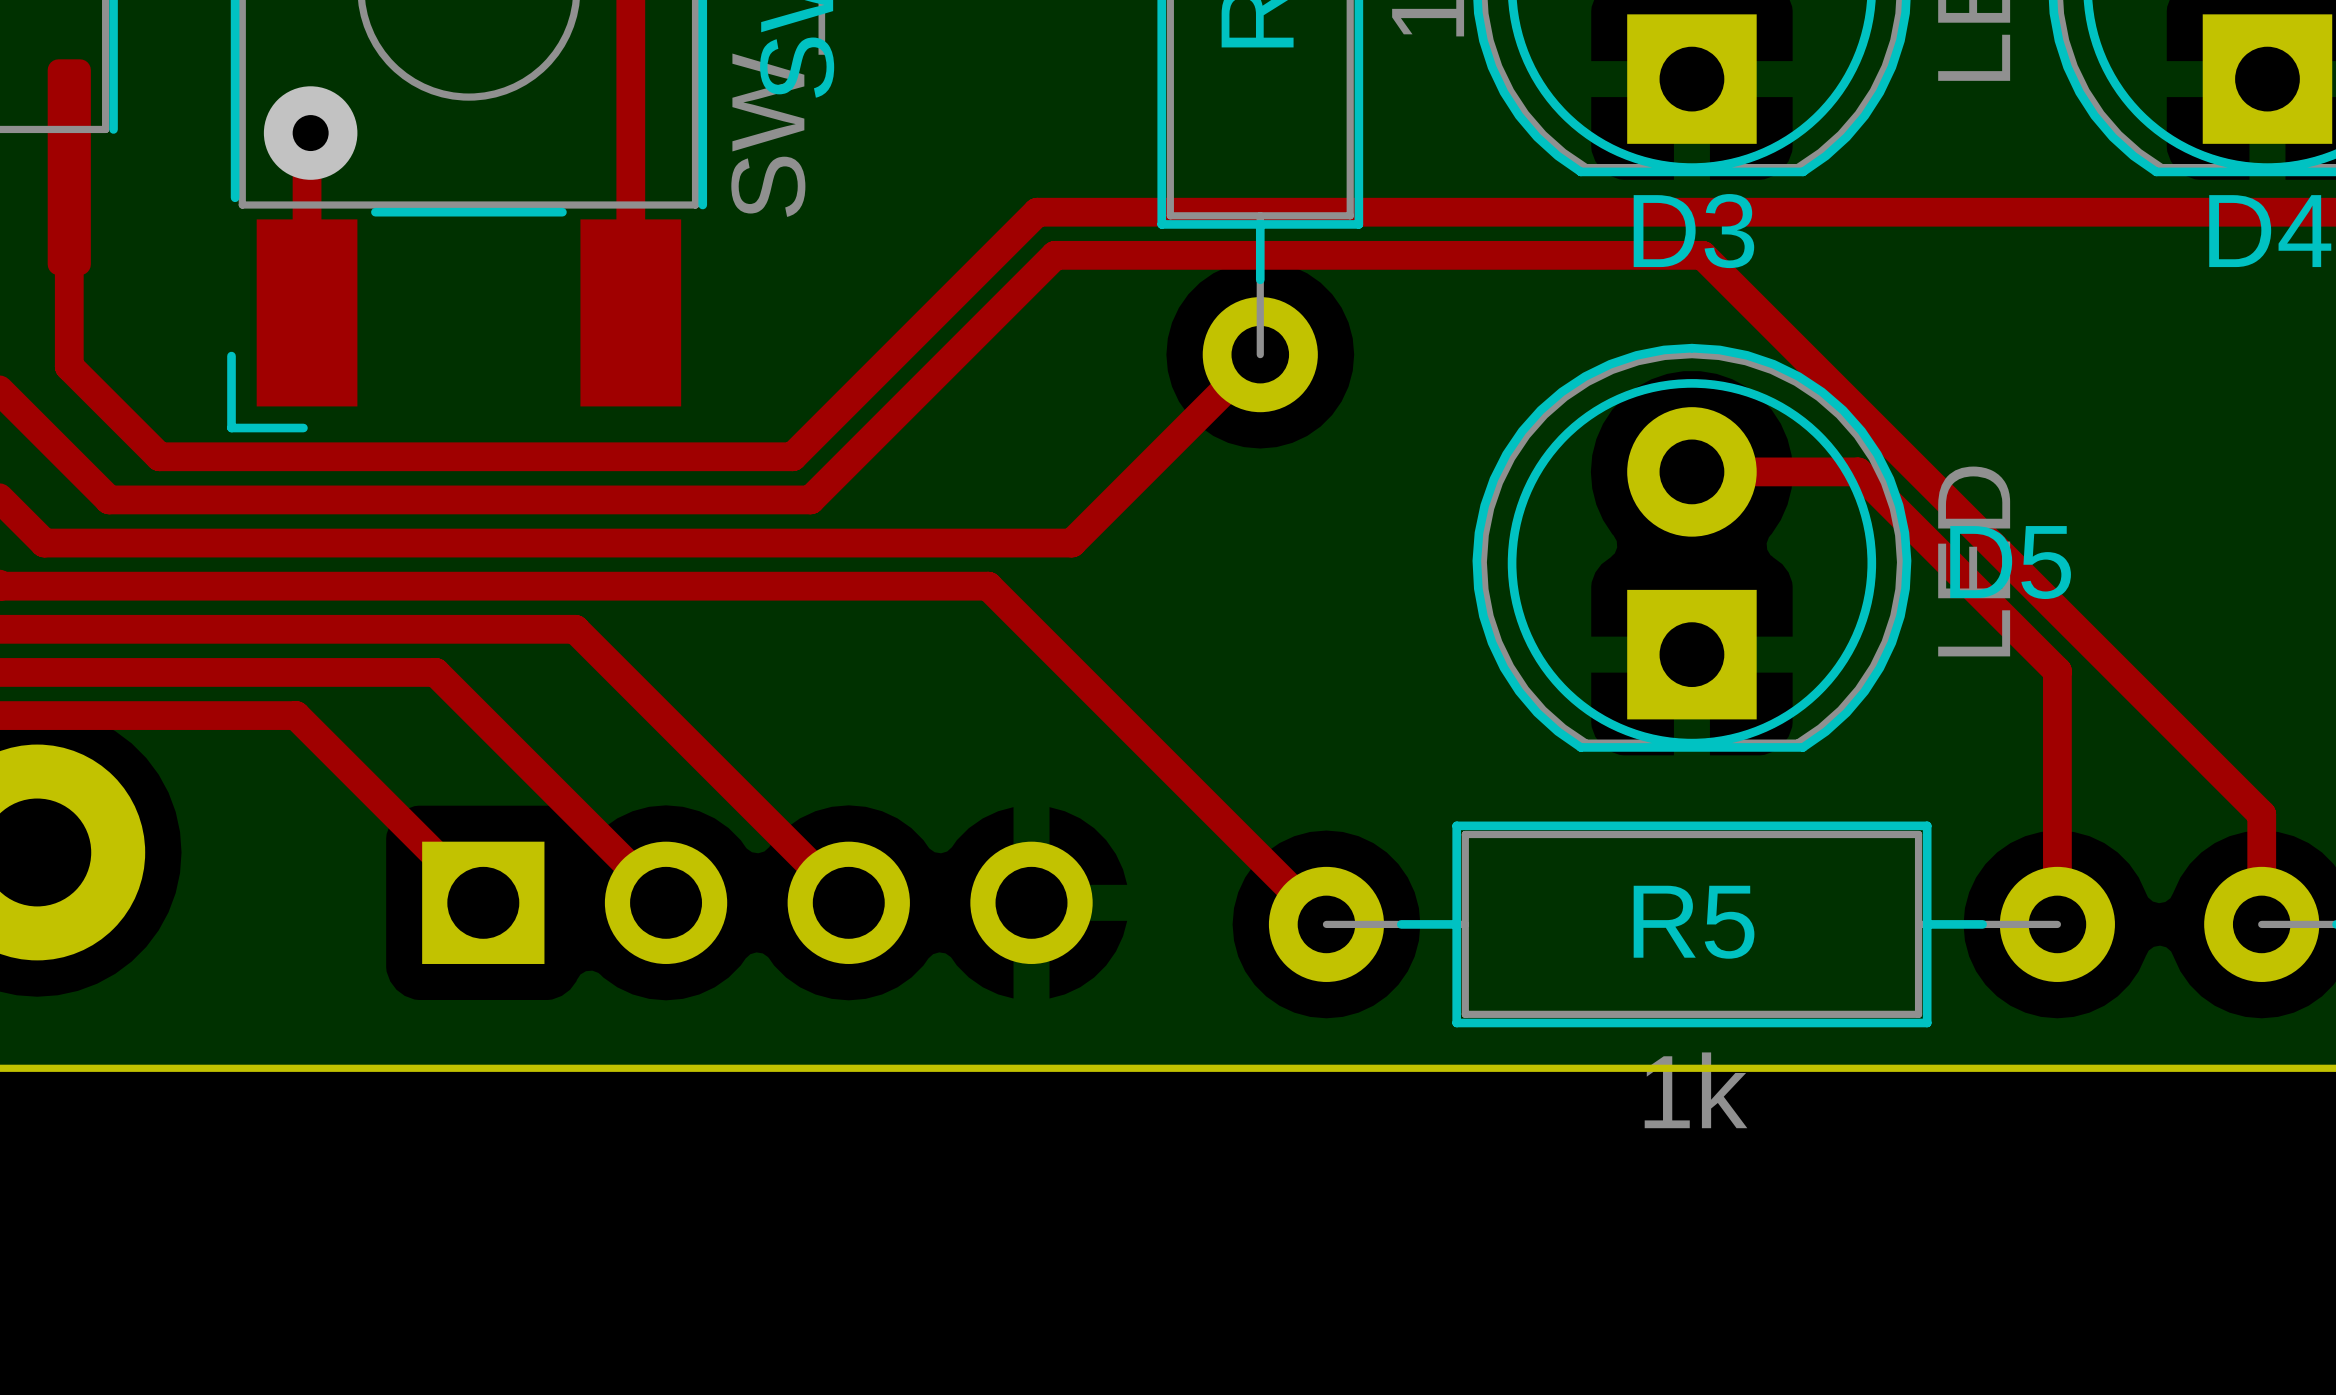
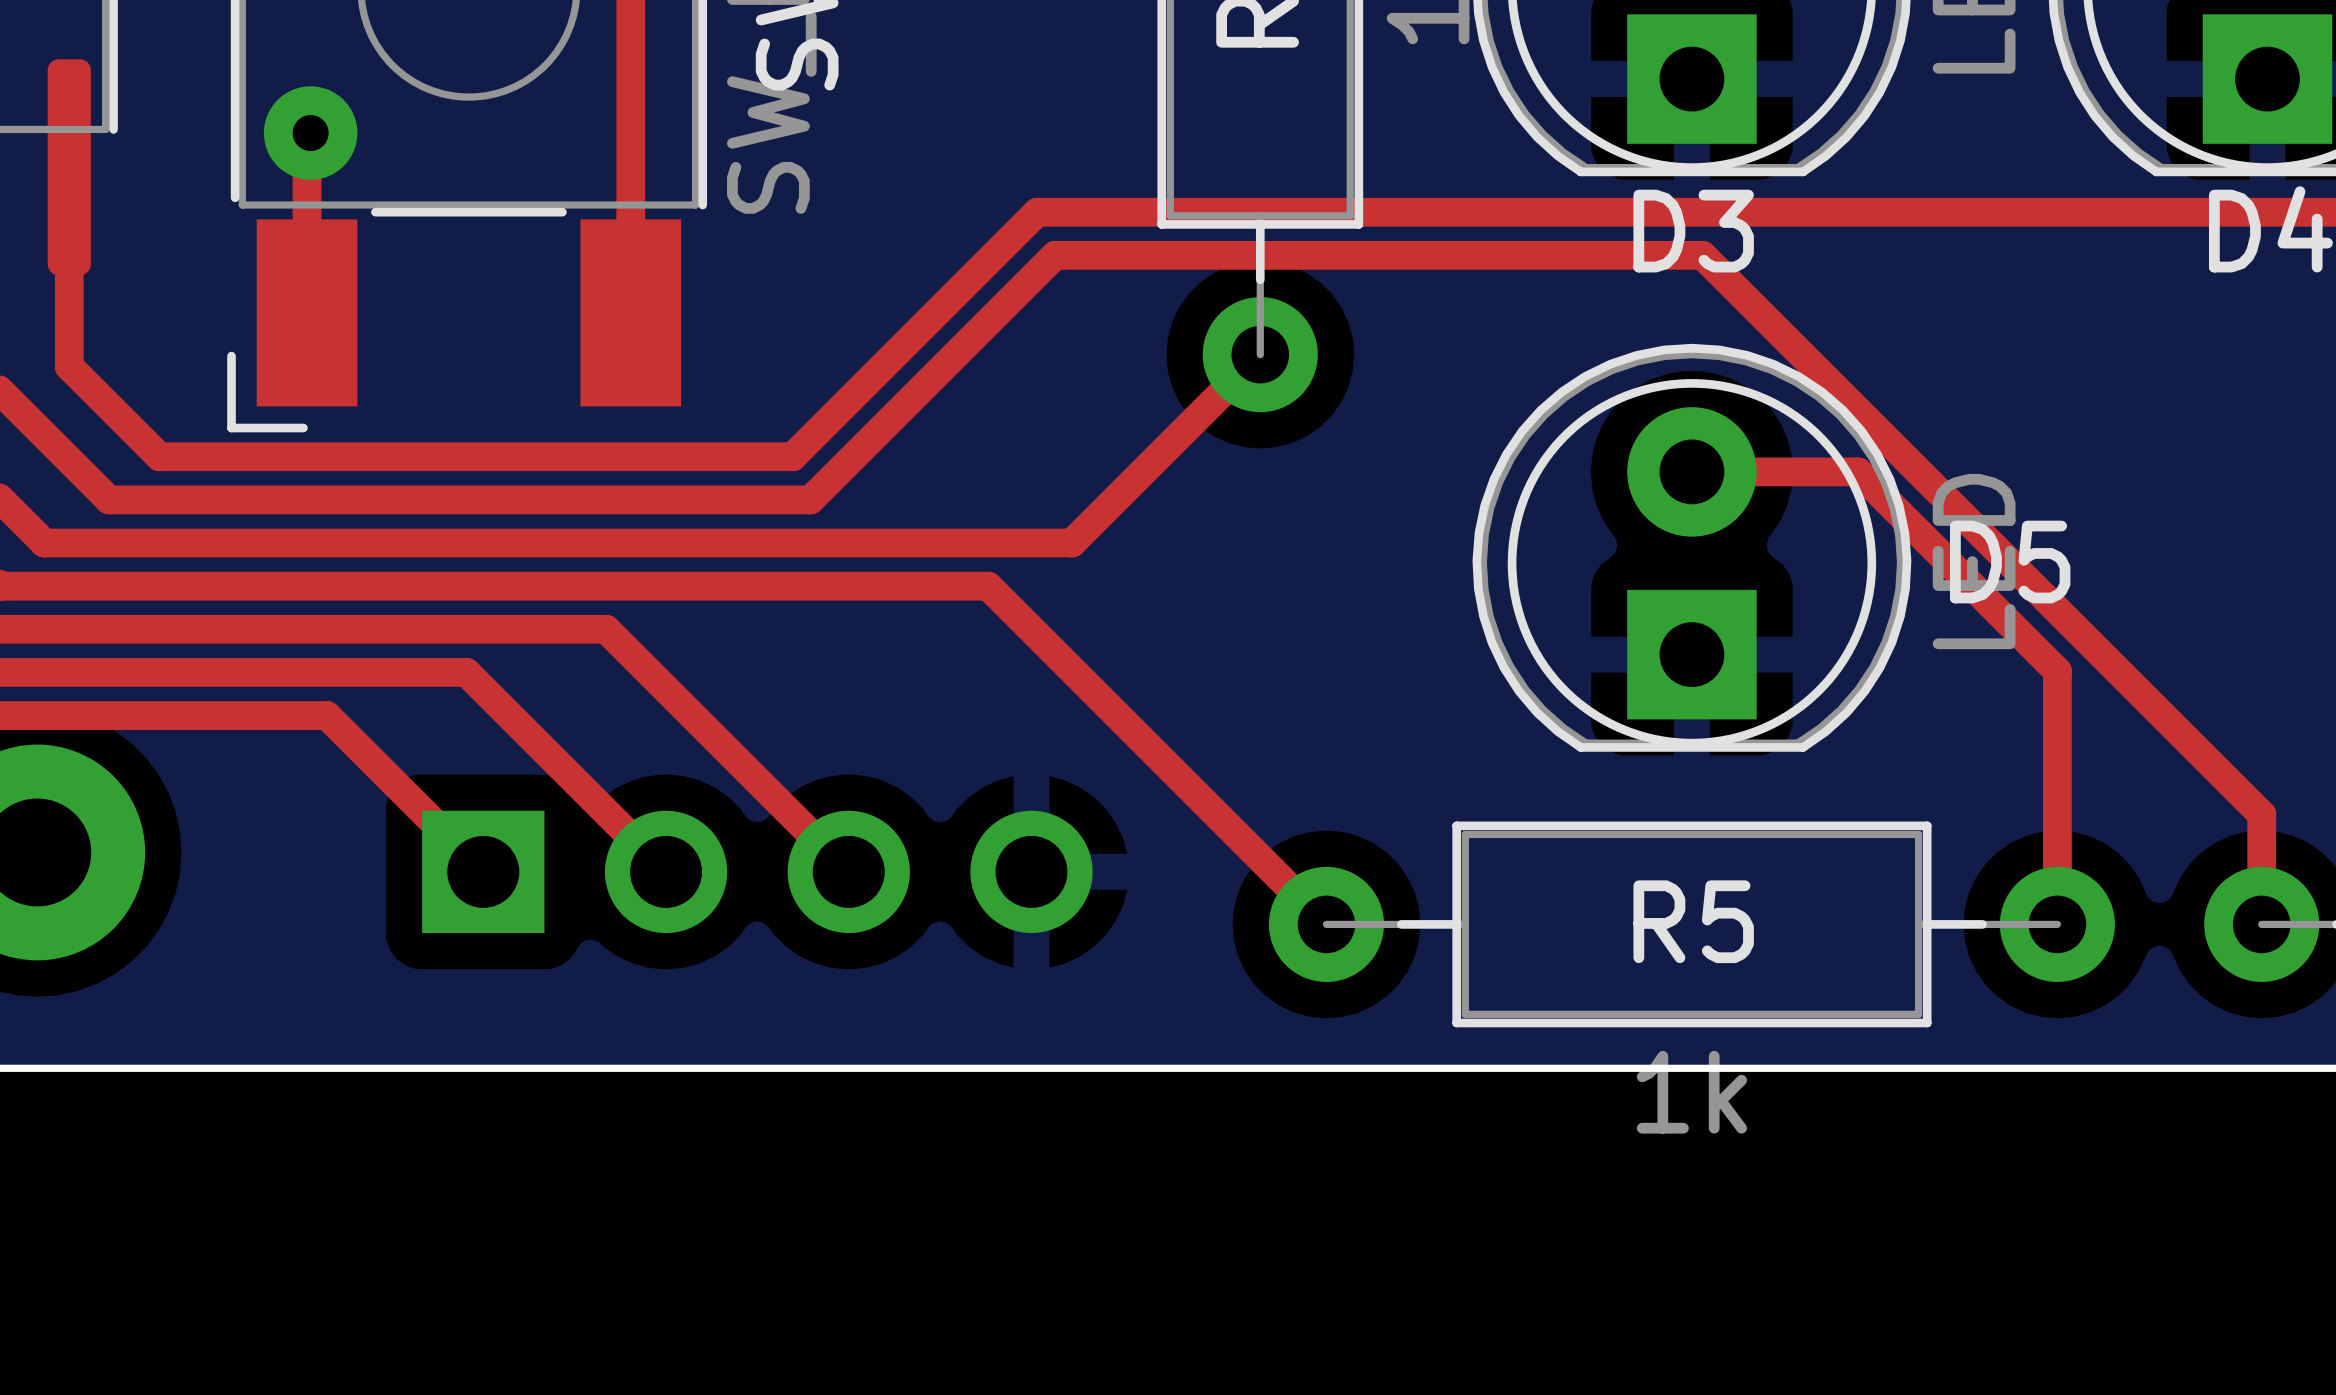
top track: (575, 629) (848, 902) -> (575, 629) (606, 629) (848, 871)
top track: (435, 672) (666, 902) -> (435, 672) (466, 672) (666, 871)
top track: (296, 715) (483, 902) -> (296, 715) (326, 715) (483, 871)
part position: (757, 902) -> (757, 871)

